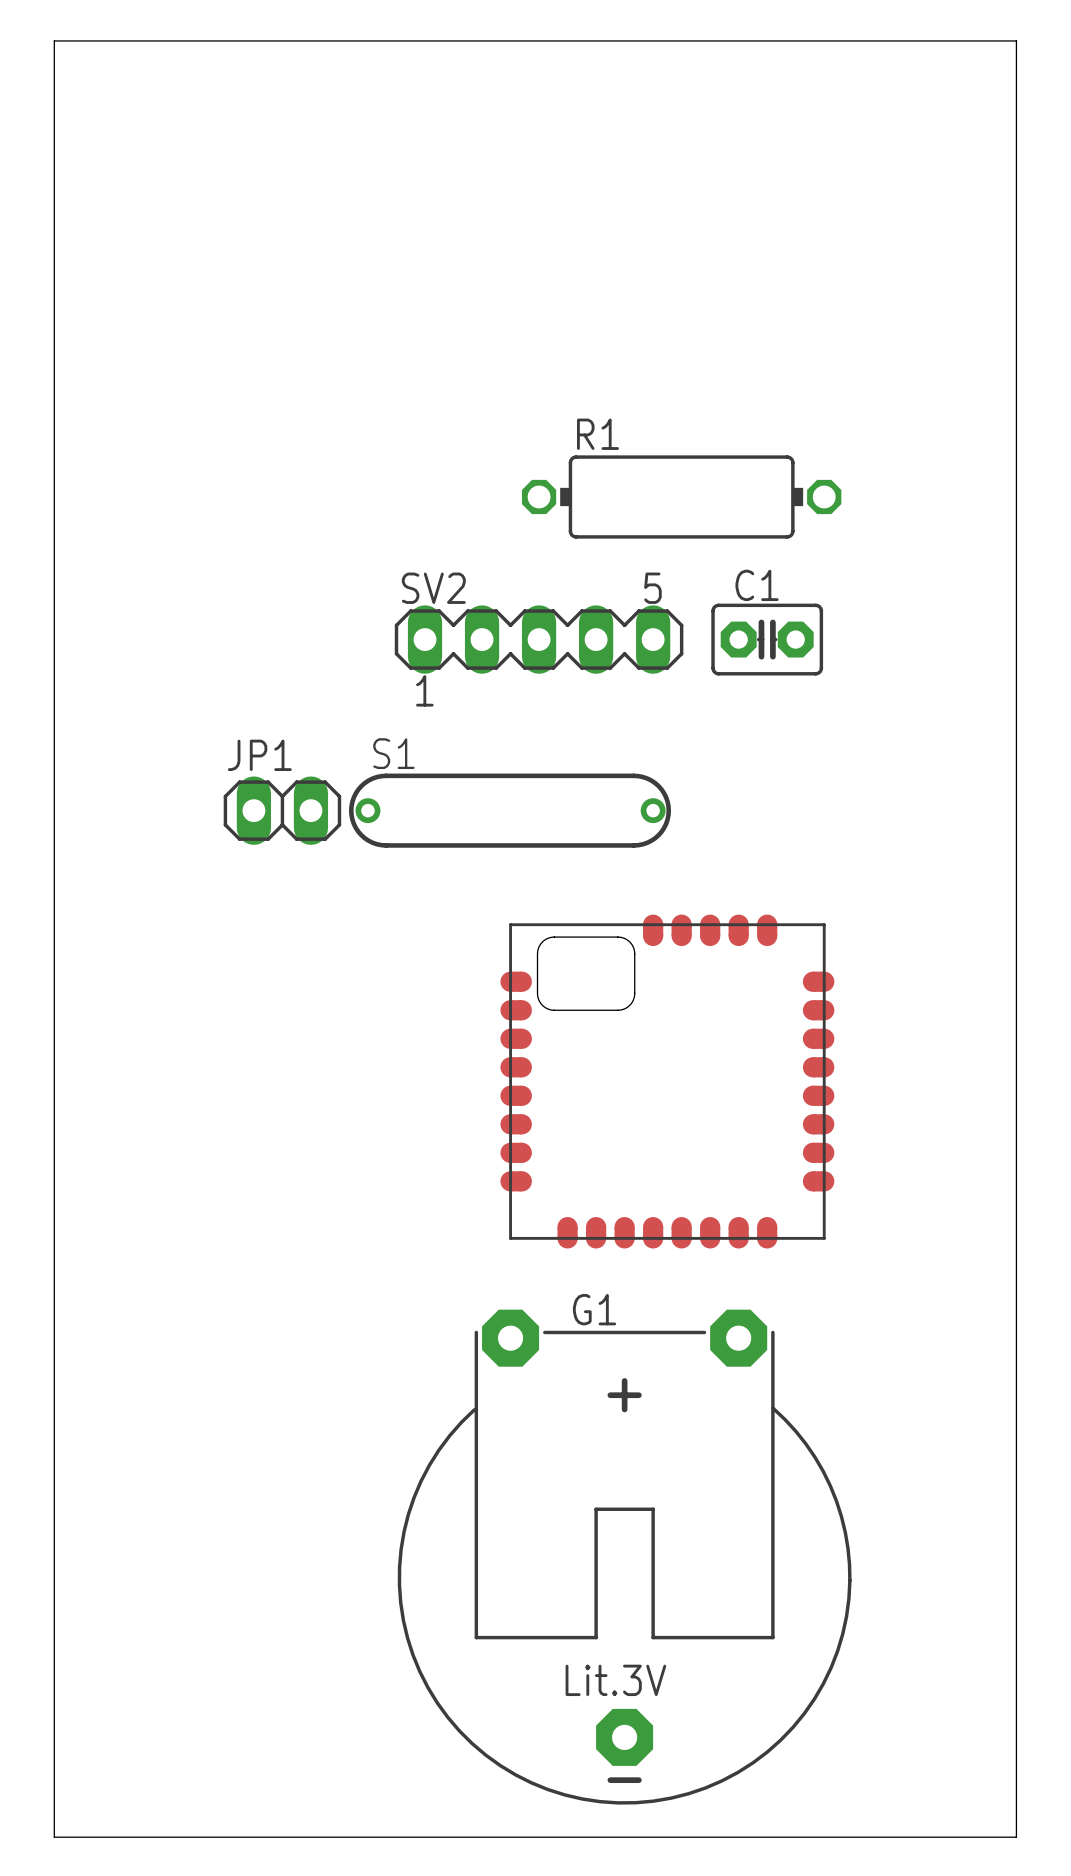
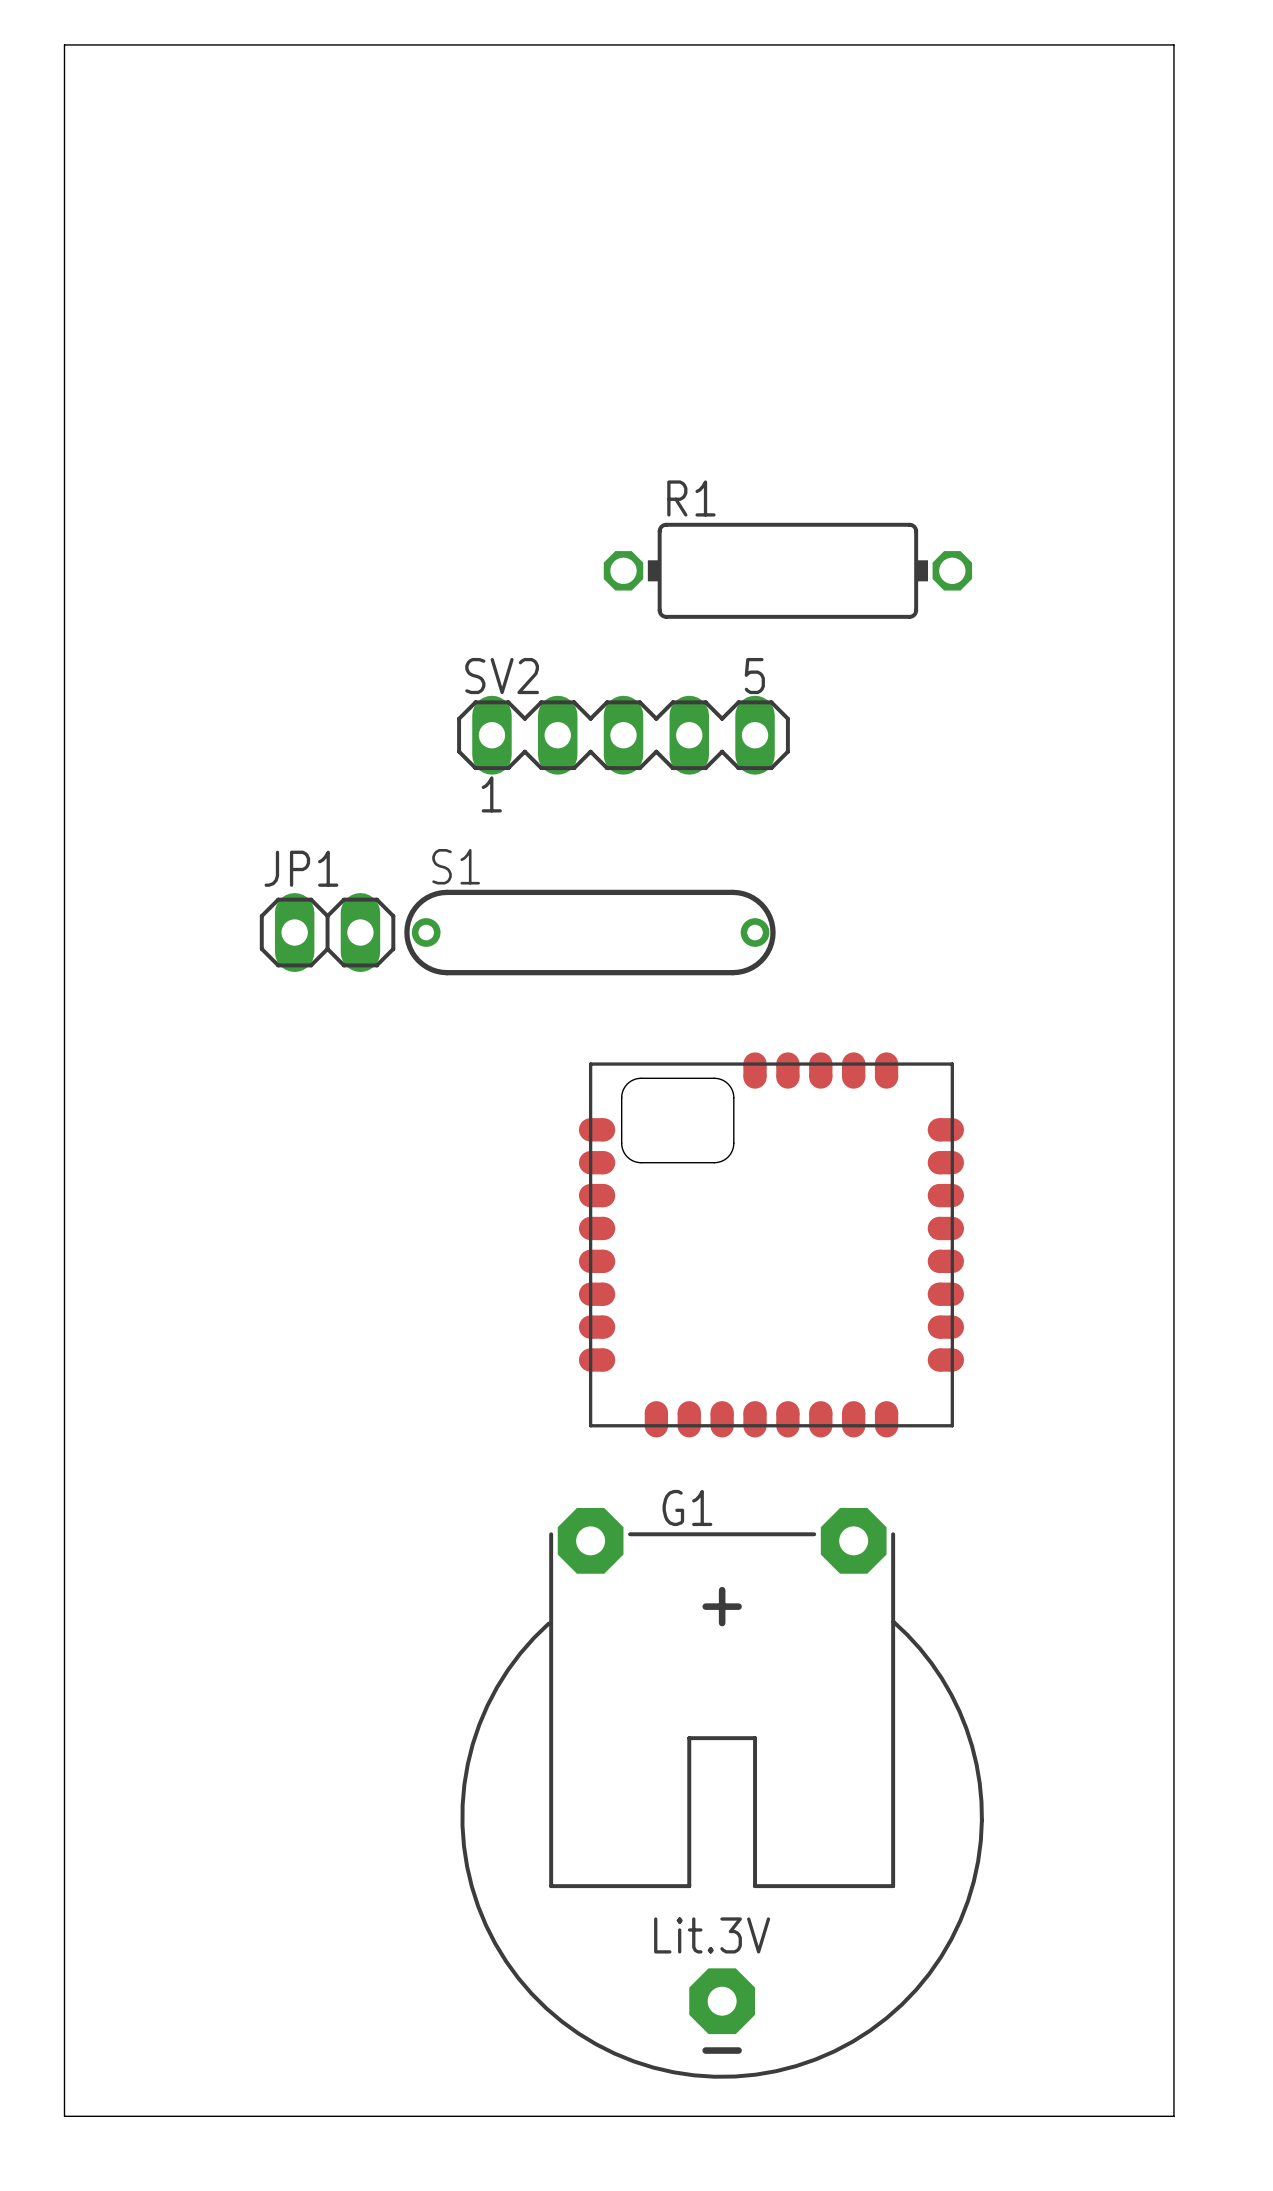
C1: (767, 639) -> none

